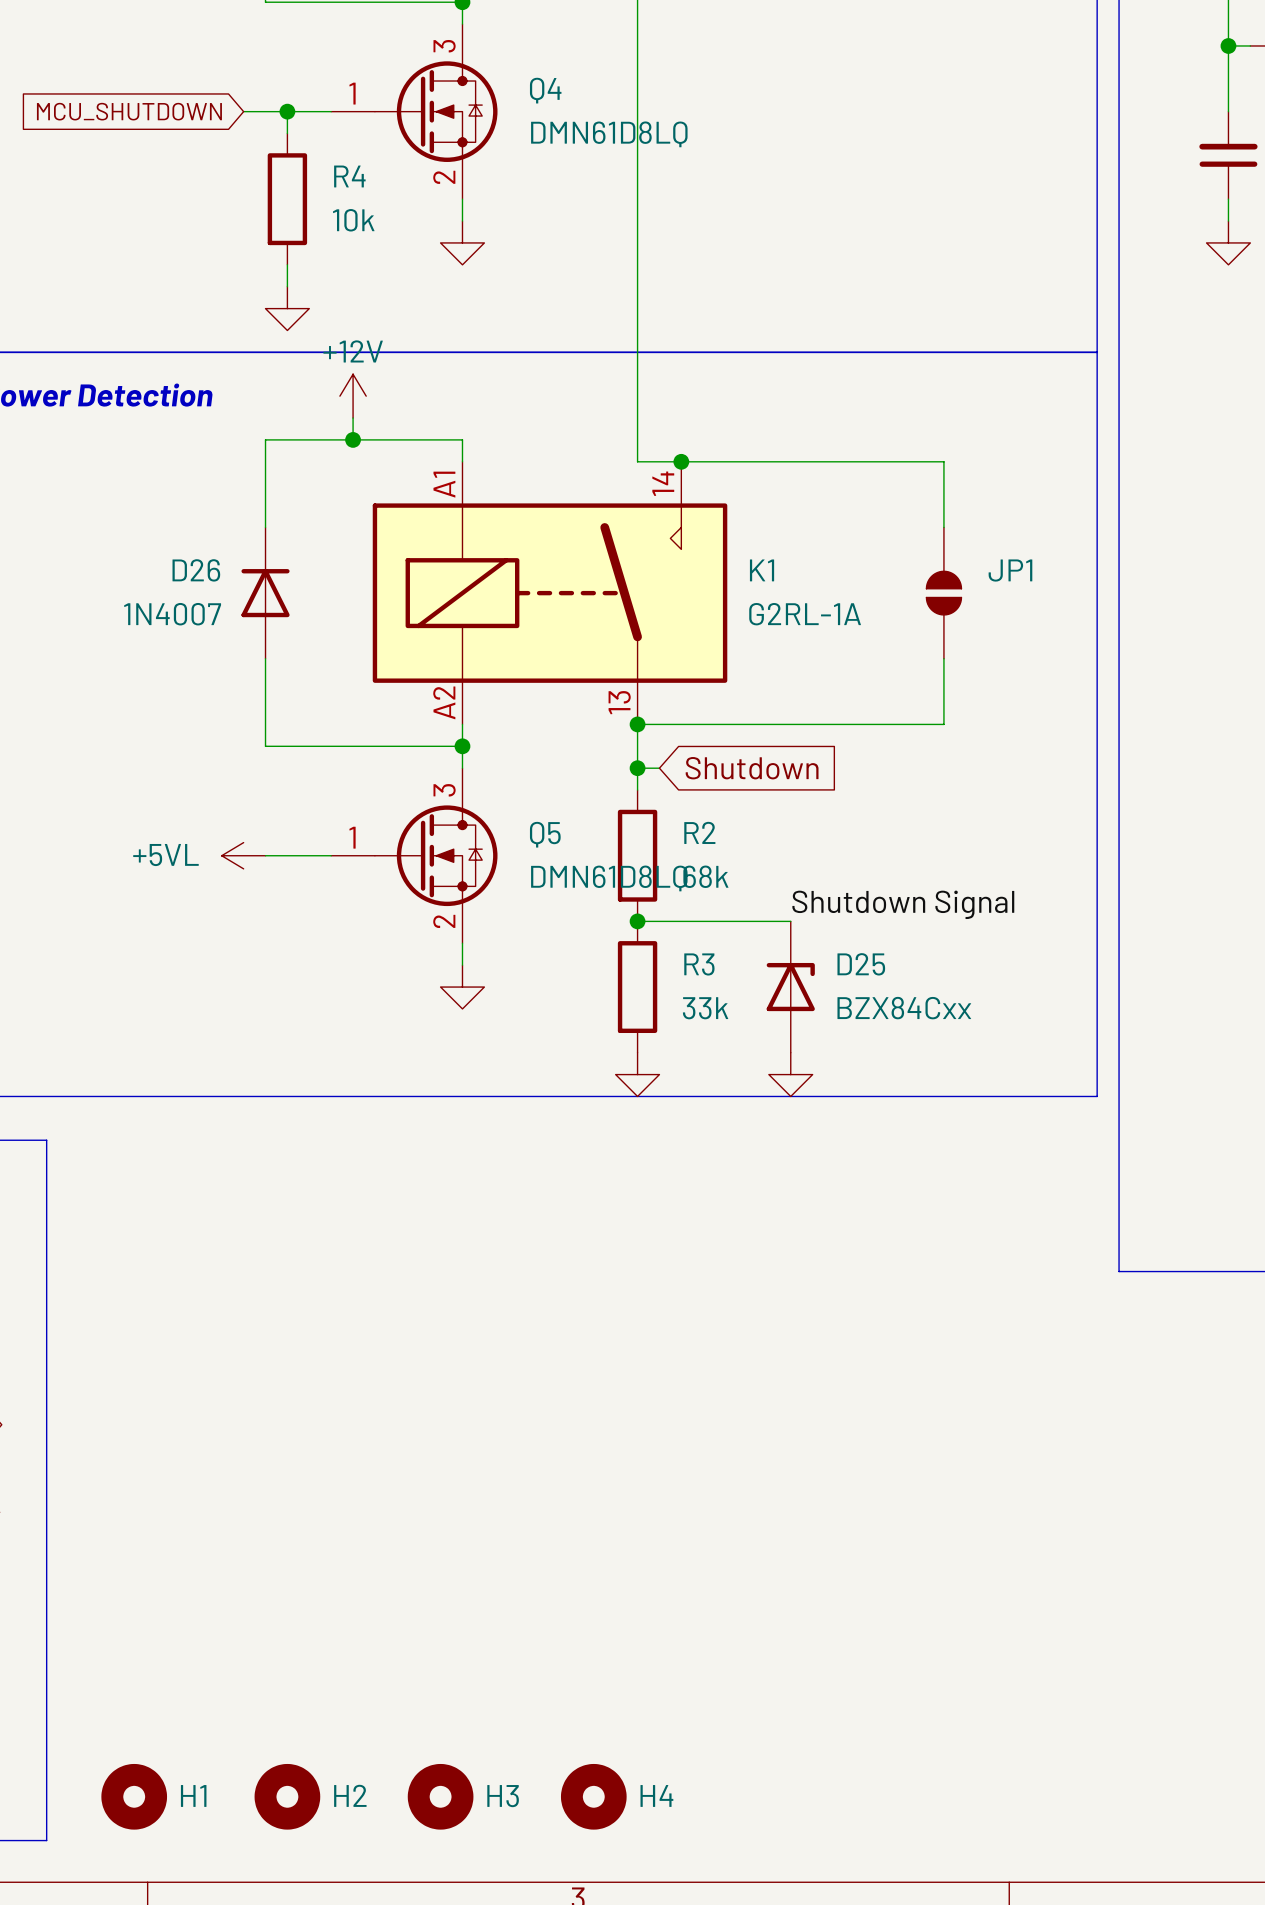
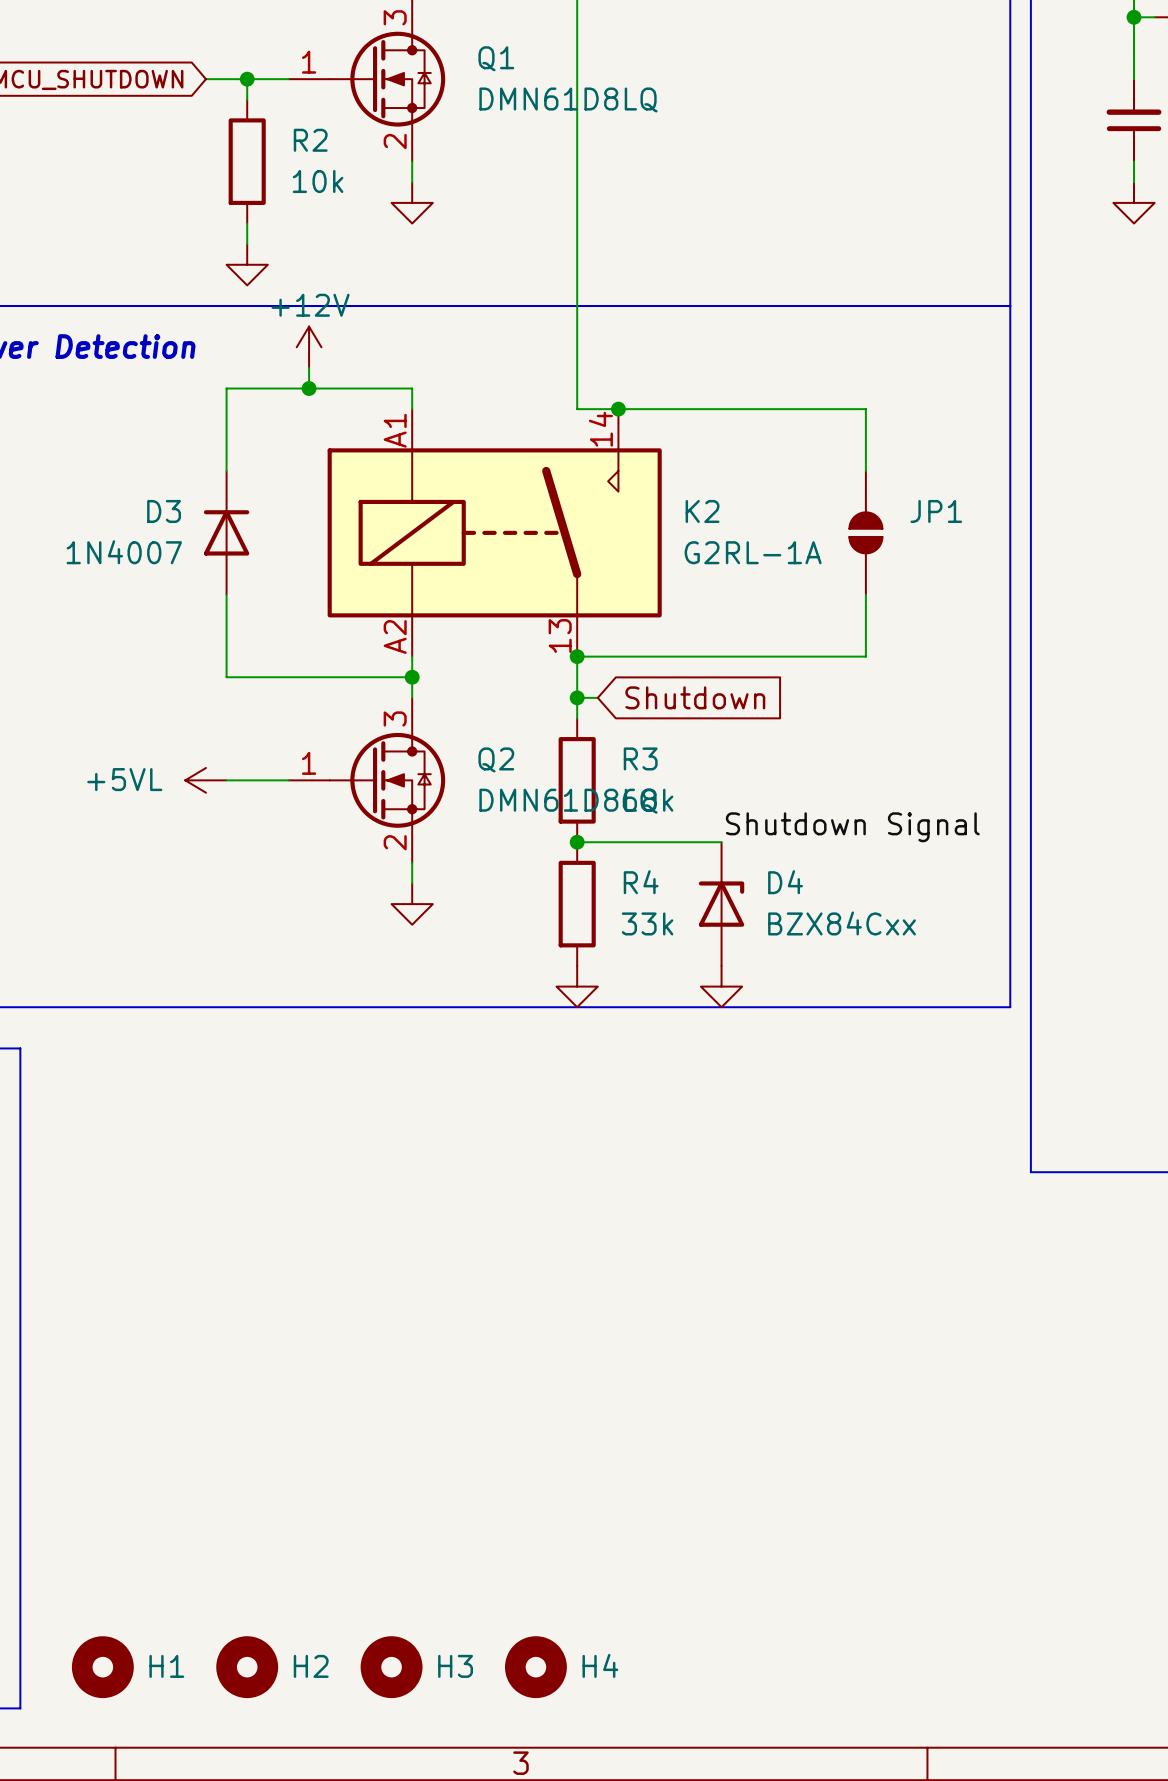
Q4 name: Q4 (545, 90) -> Q1 (496, 58)
R4 name: R4 (349, 176) -> R2 (310, 140)
D26 name: D26 (196, 570) -> D3 (164, 511)
K1 name: K1 (762, 570) -> K2 (702, 511)
R2 name: R2 (699, 832) -> R3 (640, 758)
Q5 name: Q5 (545, 834) -> Q2 (496, 759)
R3 name: R3 (699, 964) -> R4 (641, 882)
D25 name: D25 (861, 964) -> D4 (785, 882)

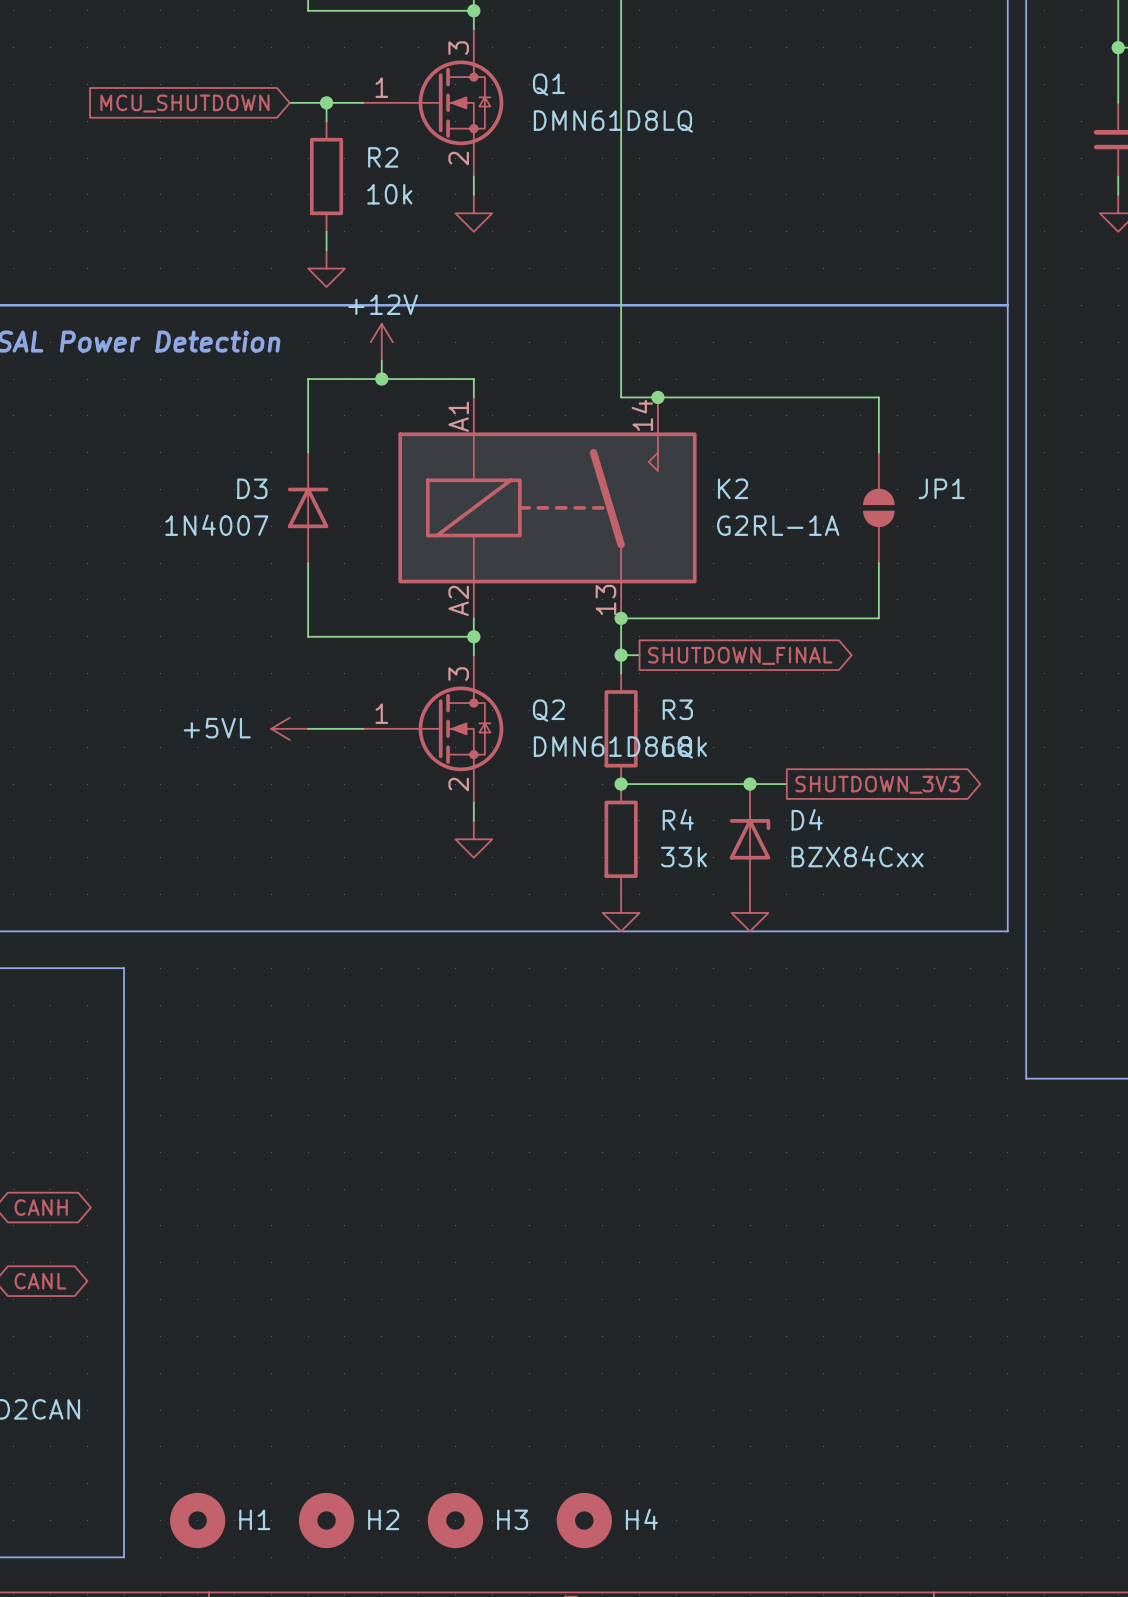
global label shape: input (695, 697) -> output (740, 655)
global label: Shutdown (695, 697) -> SHUTDOWN_FINAL (740, 655)
label: Shutdown Signal (852, 827) -> none
wire: none -> (750, 784) (786, 784)
junction: none -> (750, 784)
global label: none -> SHUTDOWN_3V3 (877, 784)

